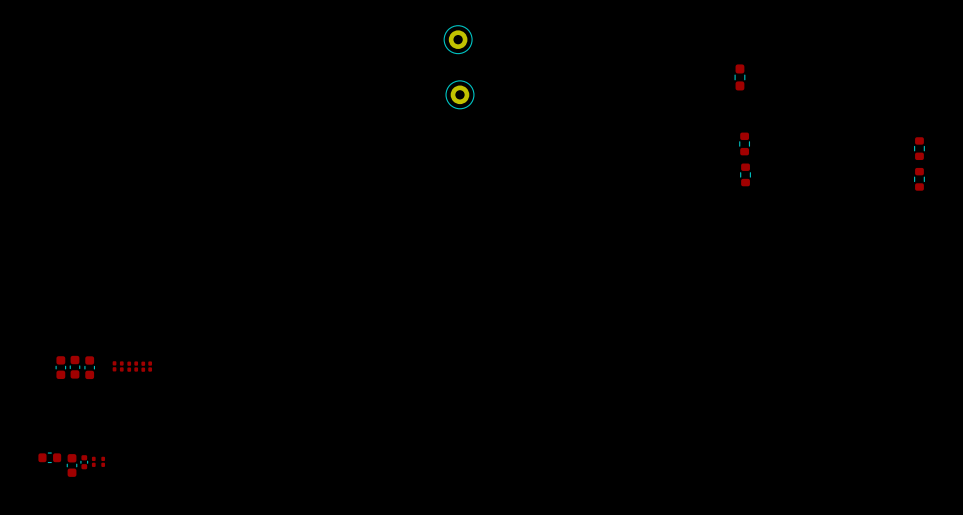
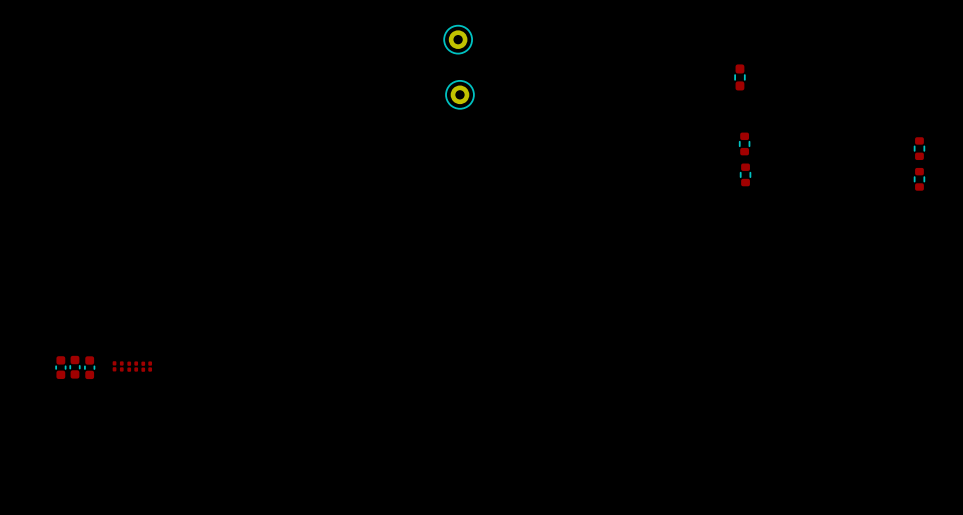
part: (49, 457) -> none
part: (93, 461) -> none
part: (103, 461) -> none
part: (84, 462) -> none
part: (72, 465) -> none

